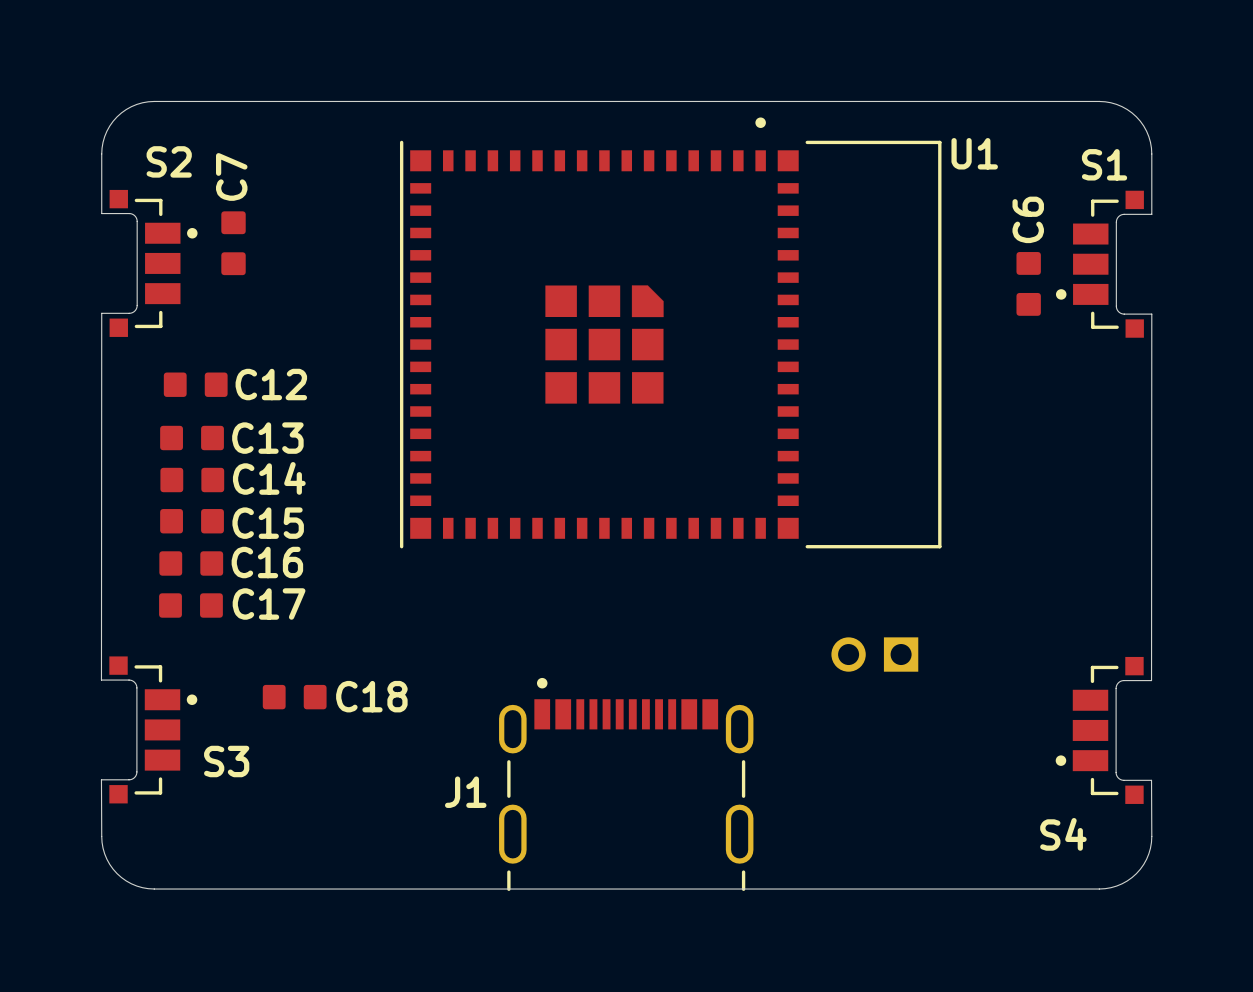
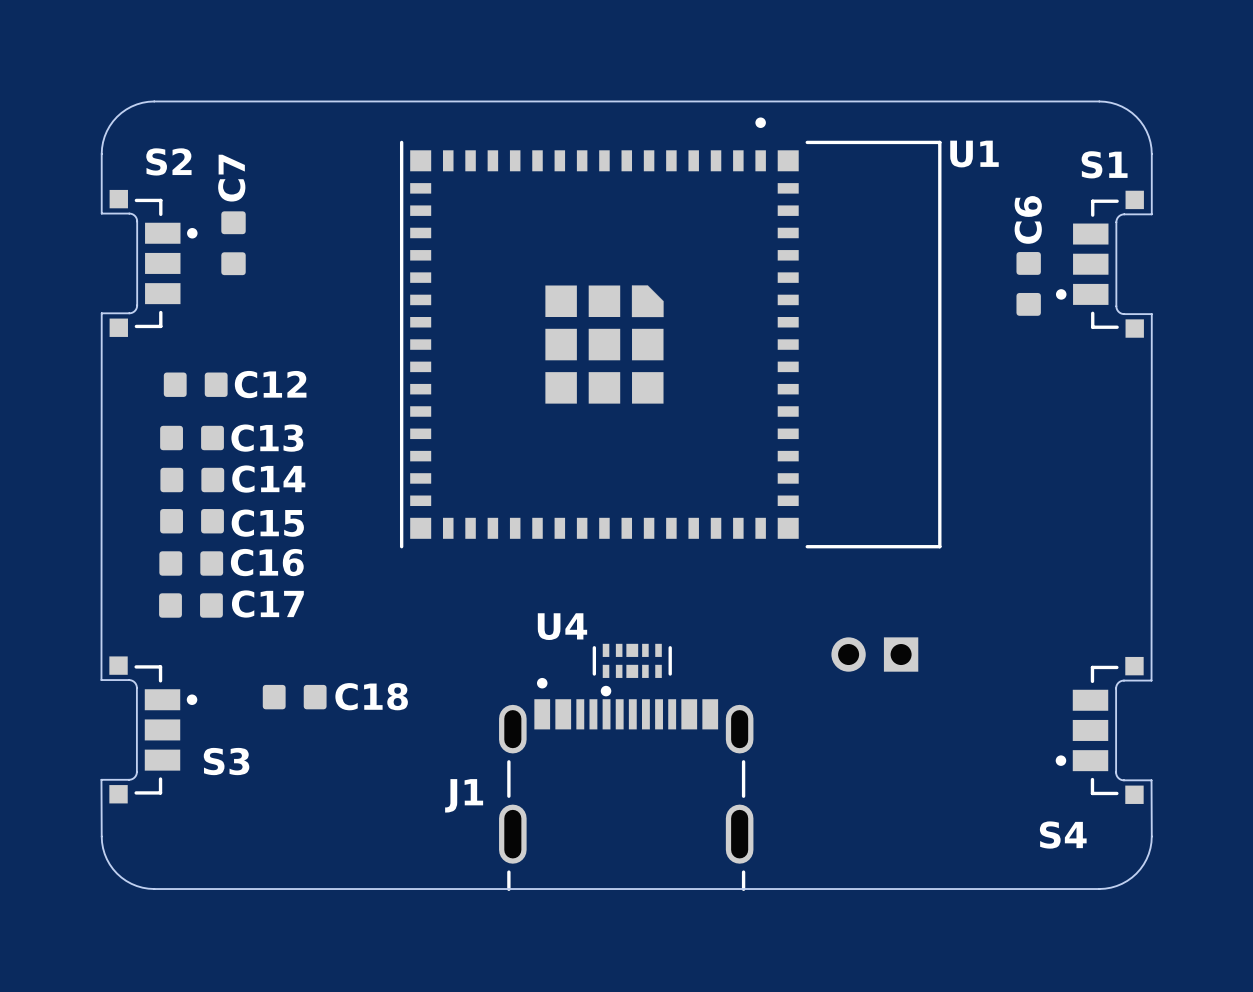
U4: none -> (632, 670)

